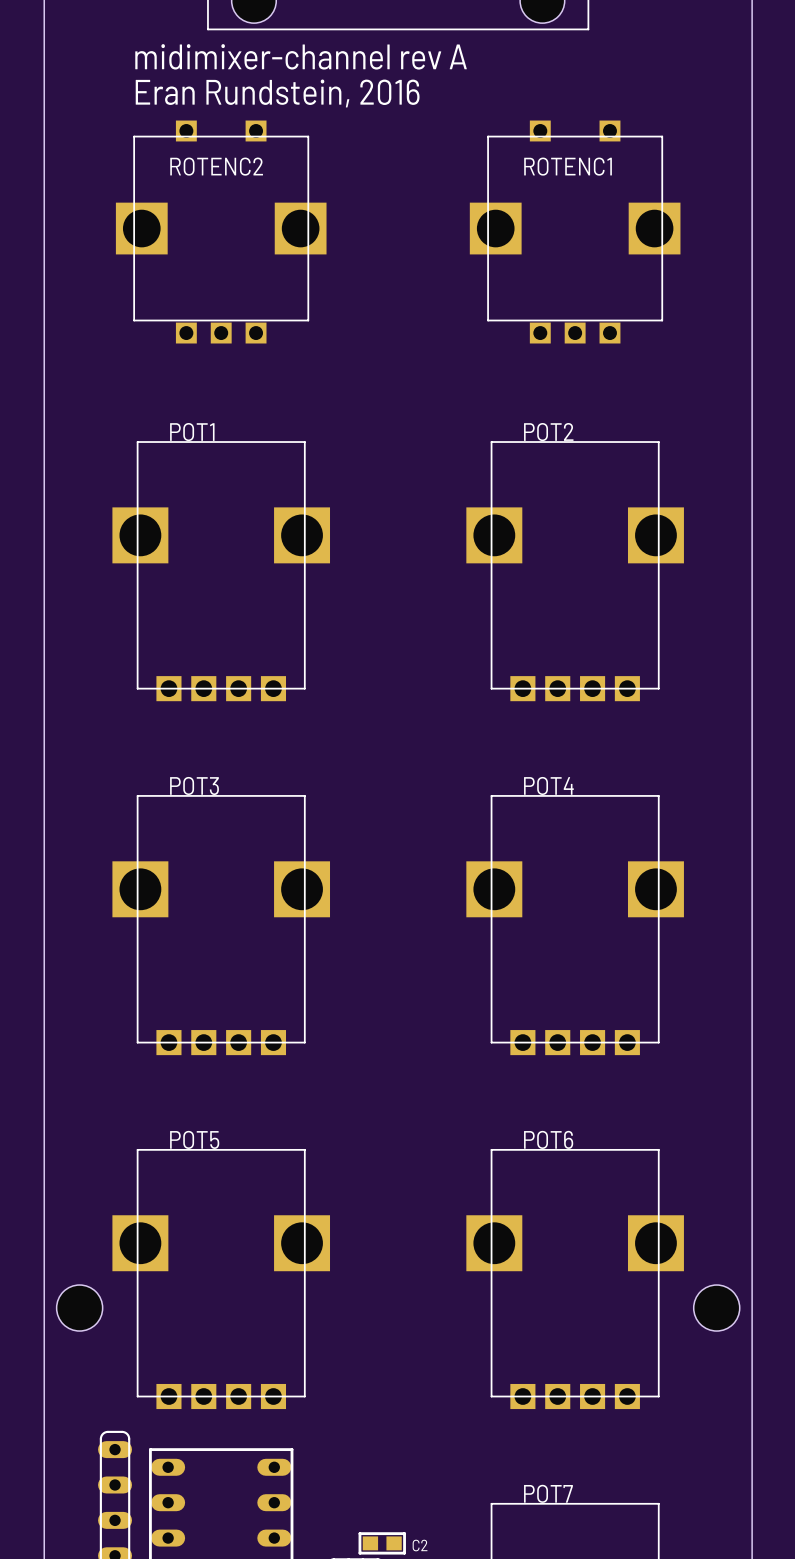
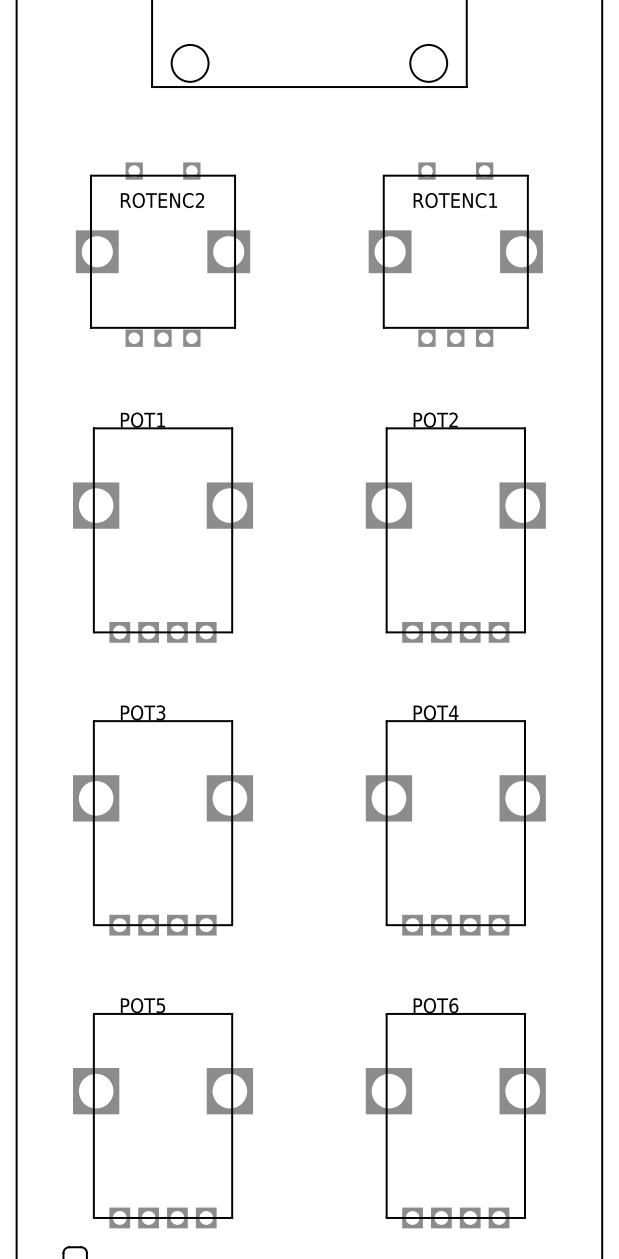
text: midimixer-channel rev A (301, 56) -> none
text: Eran Rundstein, 2016 (277, 93) -> none
part: (79, 1308) -> none
part: (716, 1308) -> none

